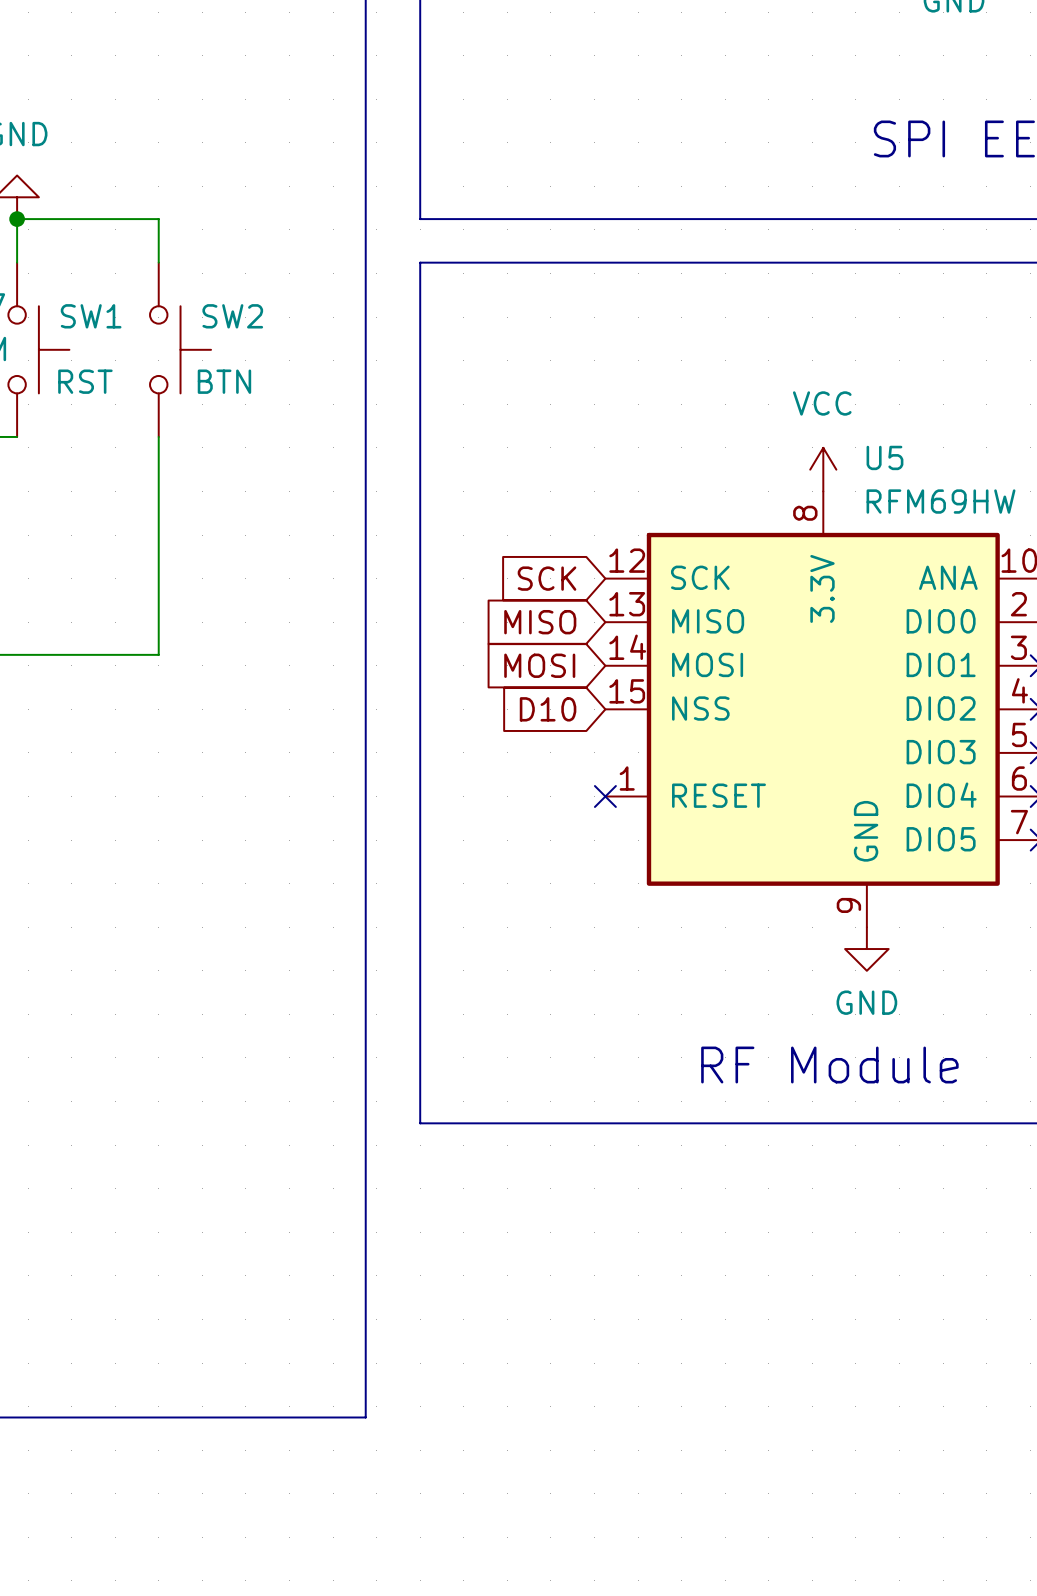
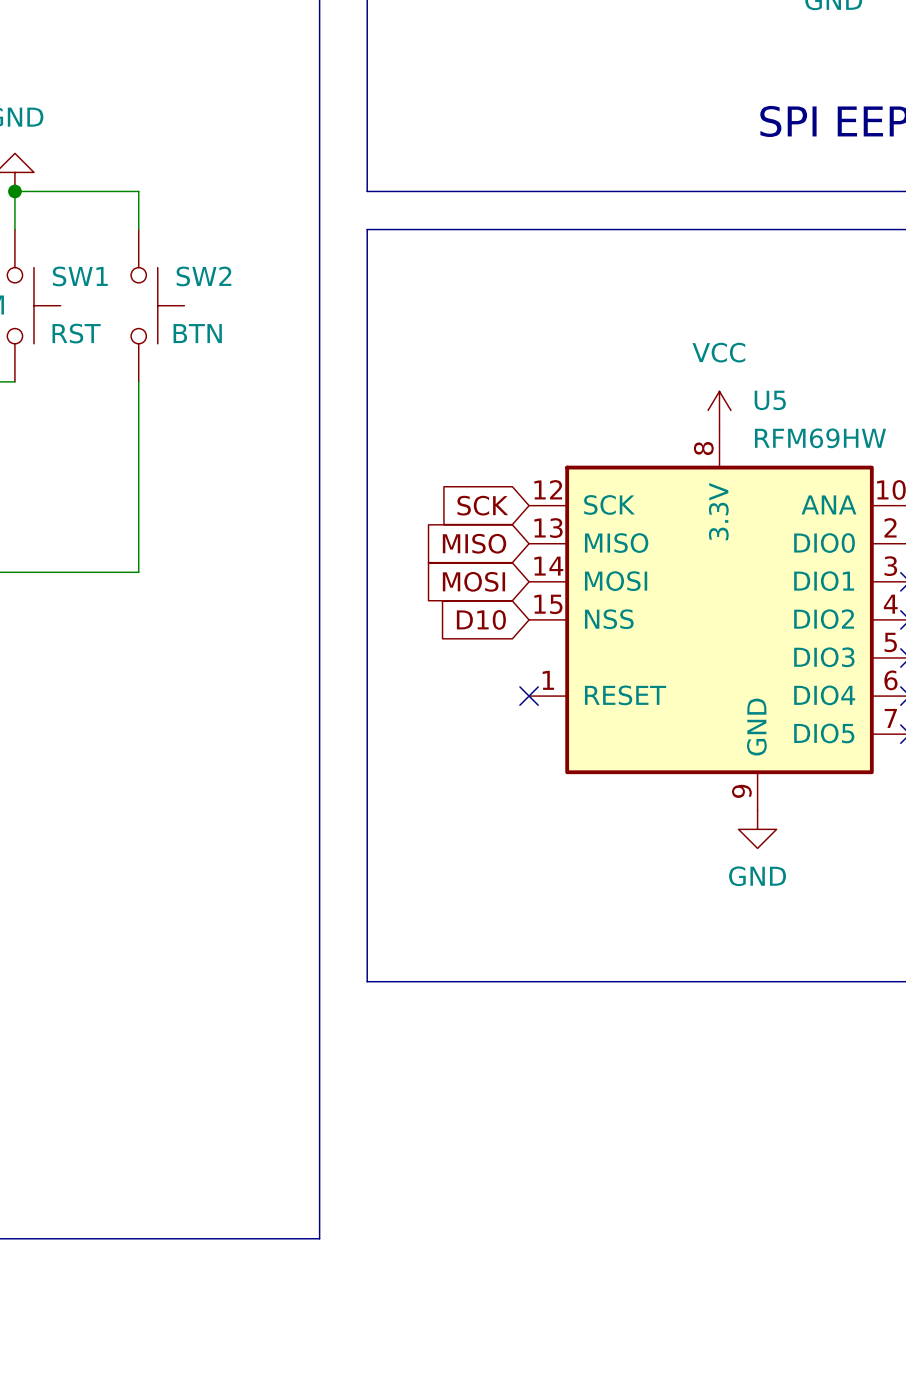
text: RF Module (829, 1065) -> none

